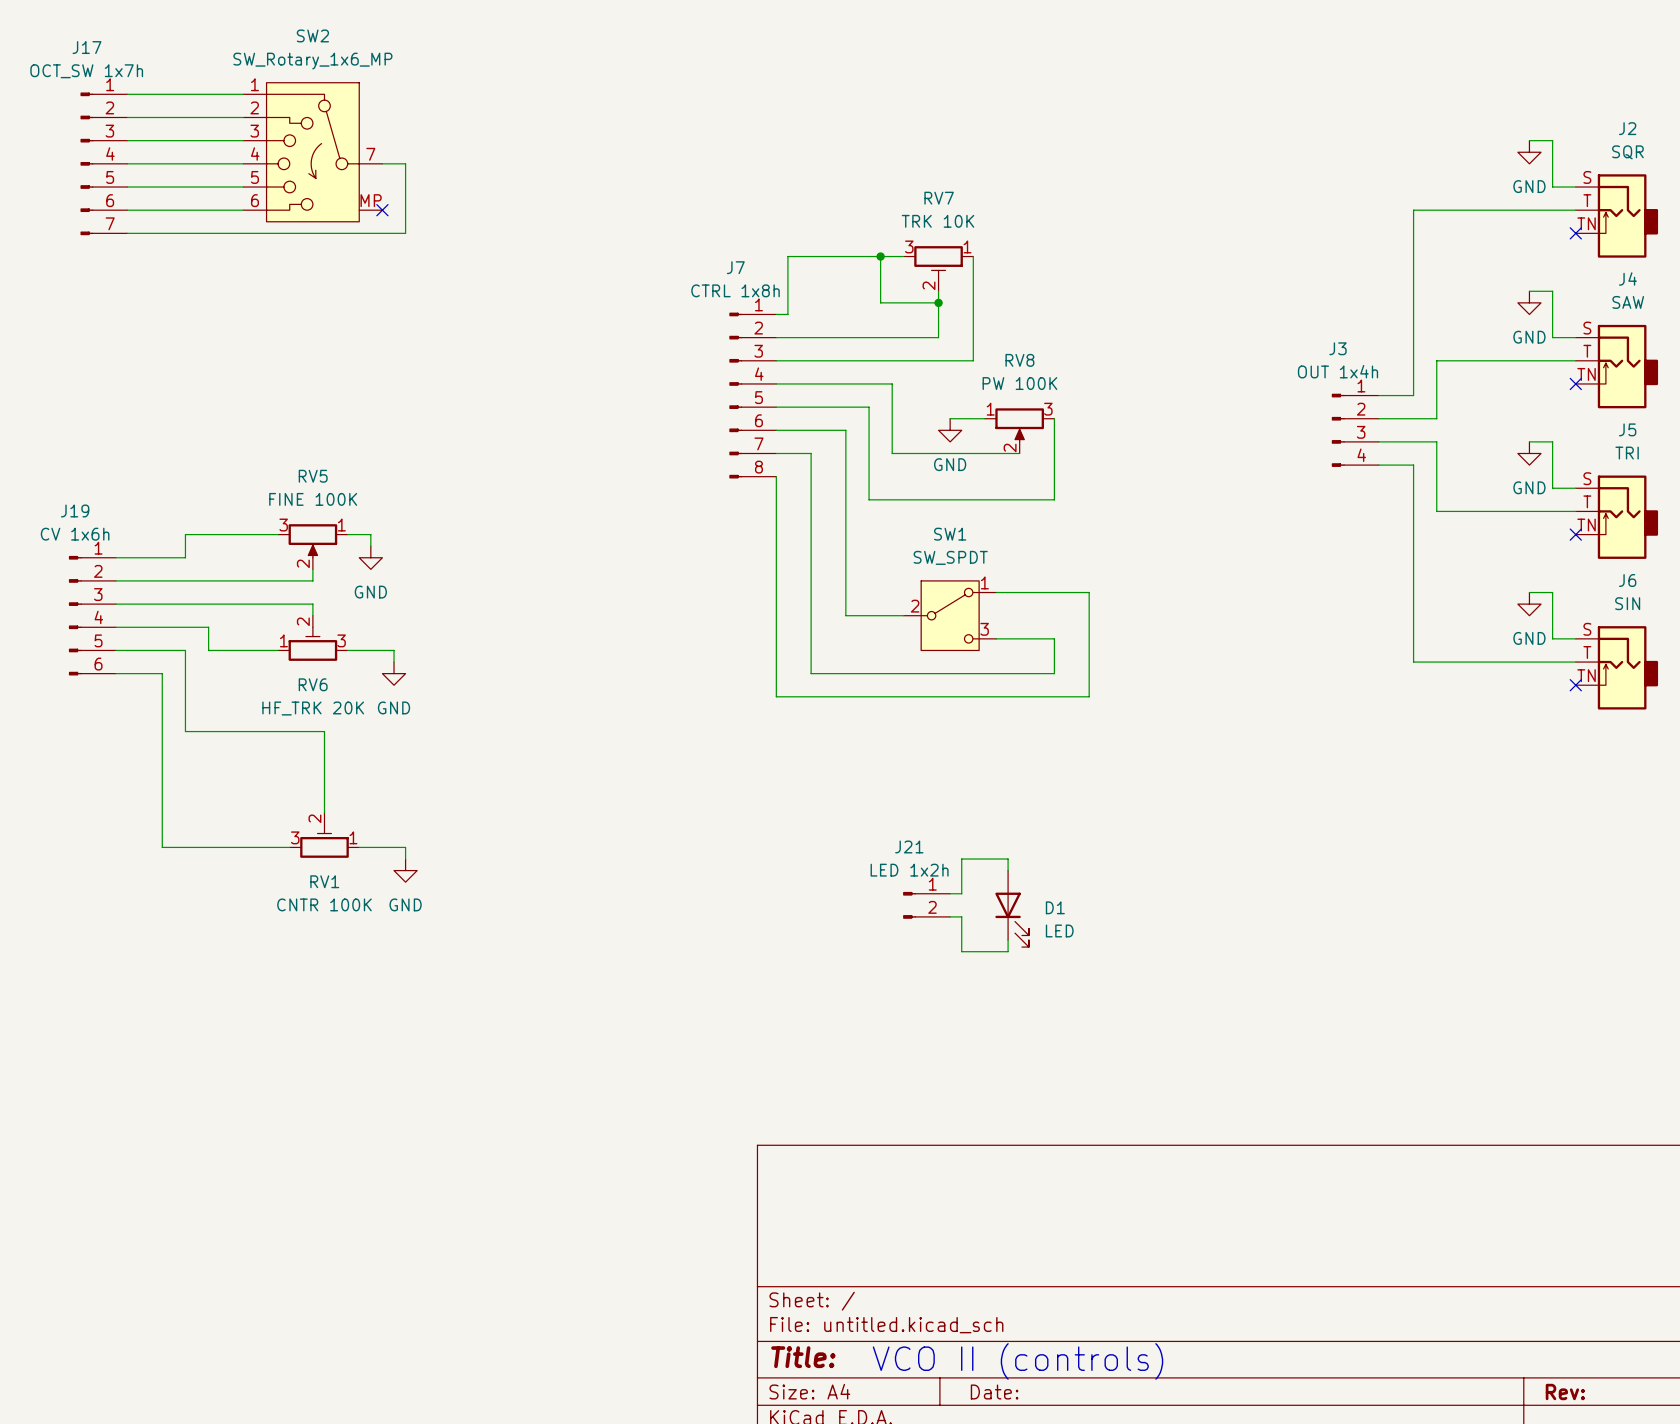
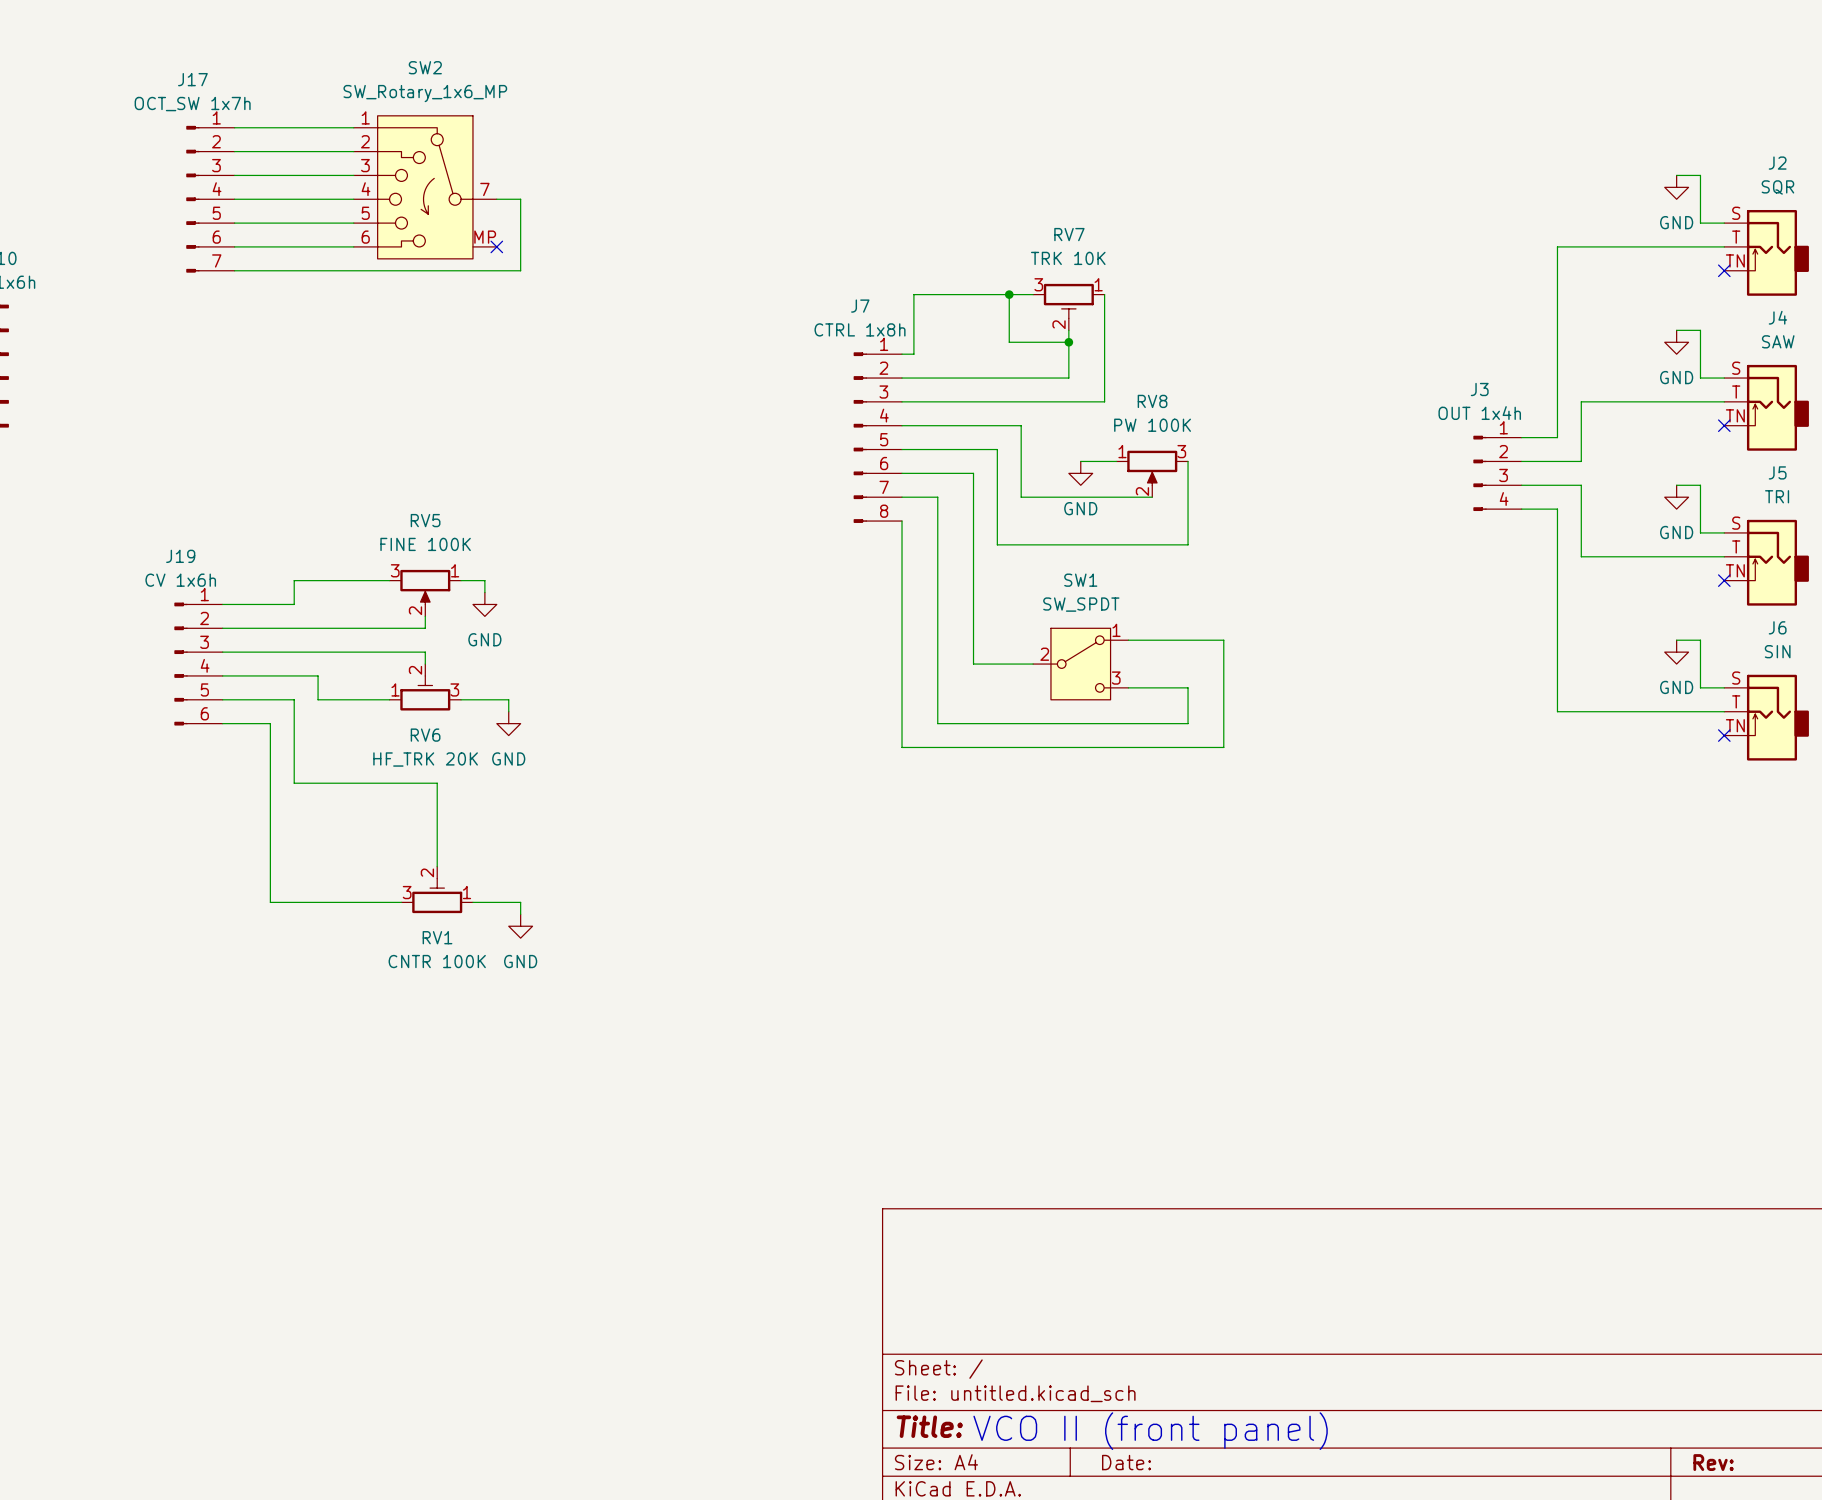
wire: (1008, 870) (1008, 859) (961, 859) (961, 893) (950, 893) -> none
J21: LED 1x2h (926, 905) -> none
D1: LED (1012, 908) -> none
wire: (950, 916) (961, 916) (961, 951) (1008, 951) (1008, 940) -> none
text: VCO II (controls) (1018, 1361) -> VCO II (front panel) (1150, 1431)

